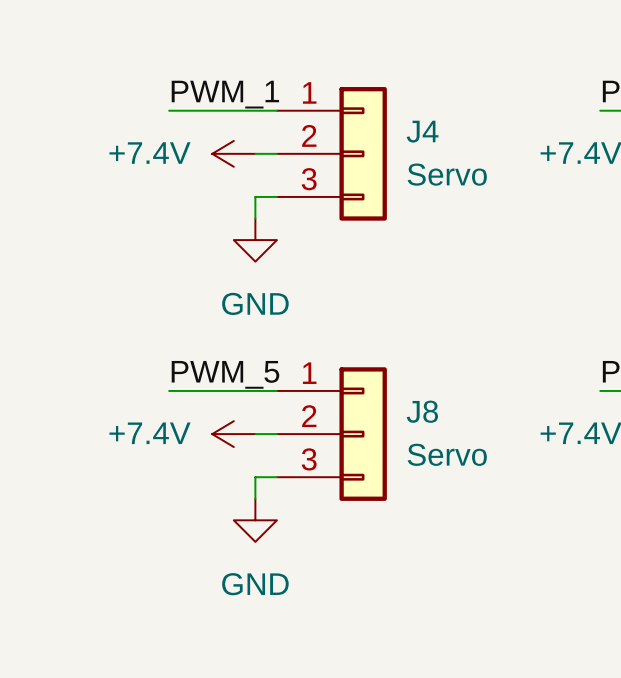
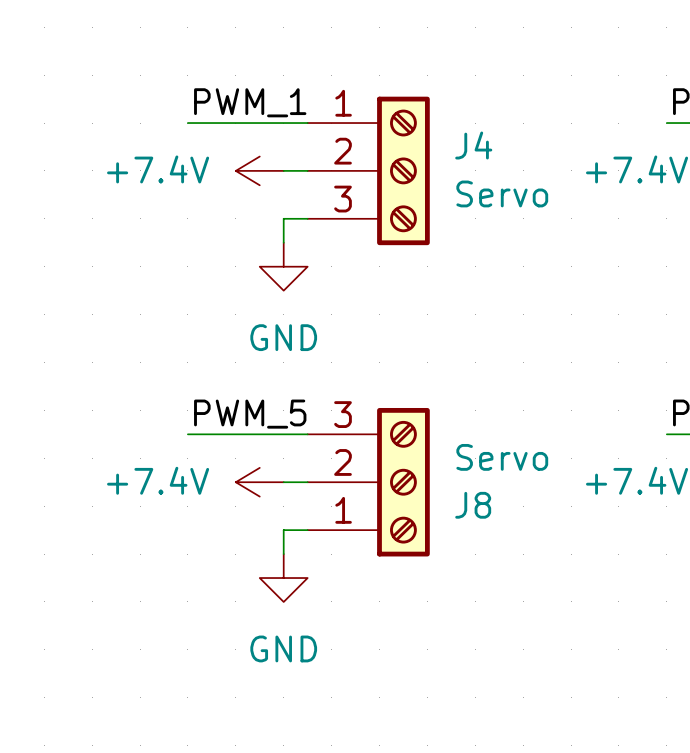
J4 symbol: [276, 87, 387, 221] -> [307, 96, 430, 246]
J8 symbol: [276, 367, 387, 501] -> [307, 407, 430, 557]
J8 name position: J8 (422, 411) -> J8 (473, 505)
J8 value position: Servo (447, 454) -> Servo (502, 457)

